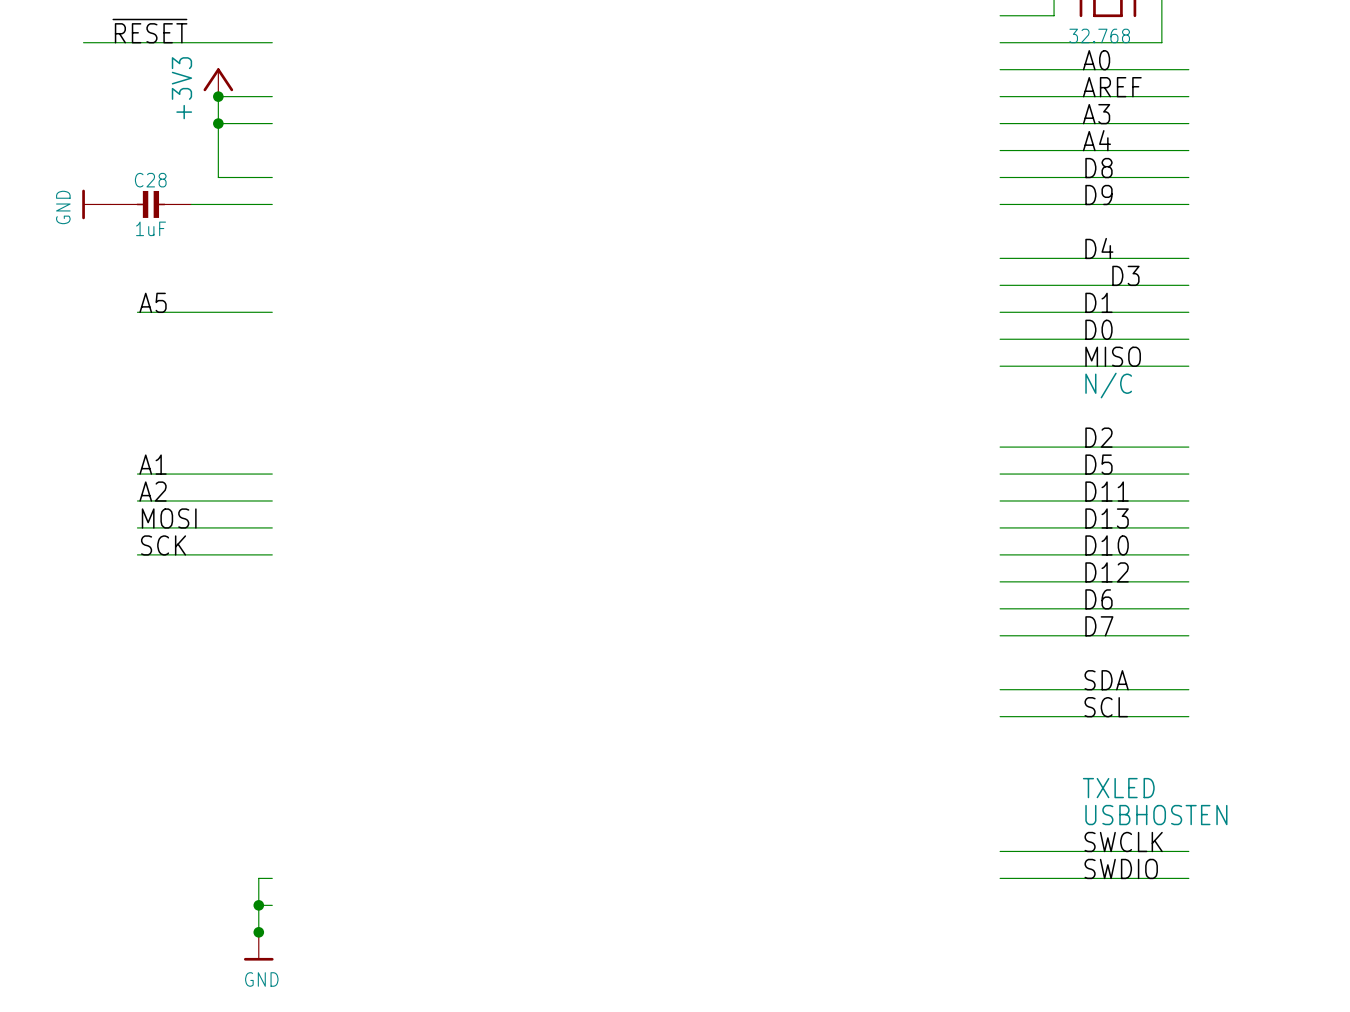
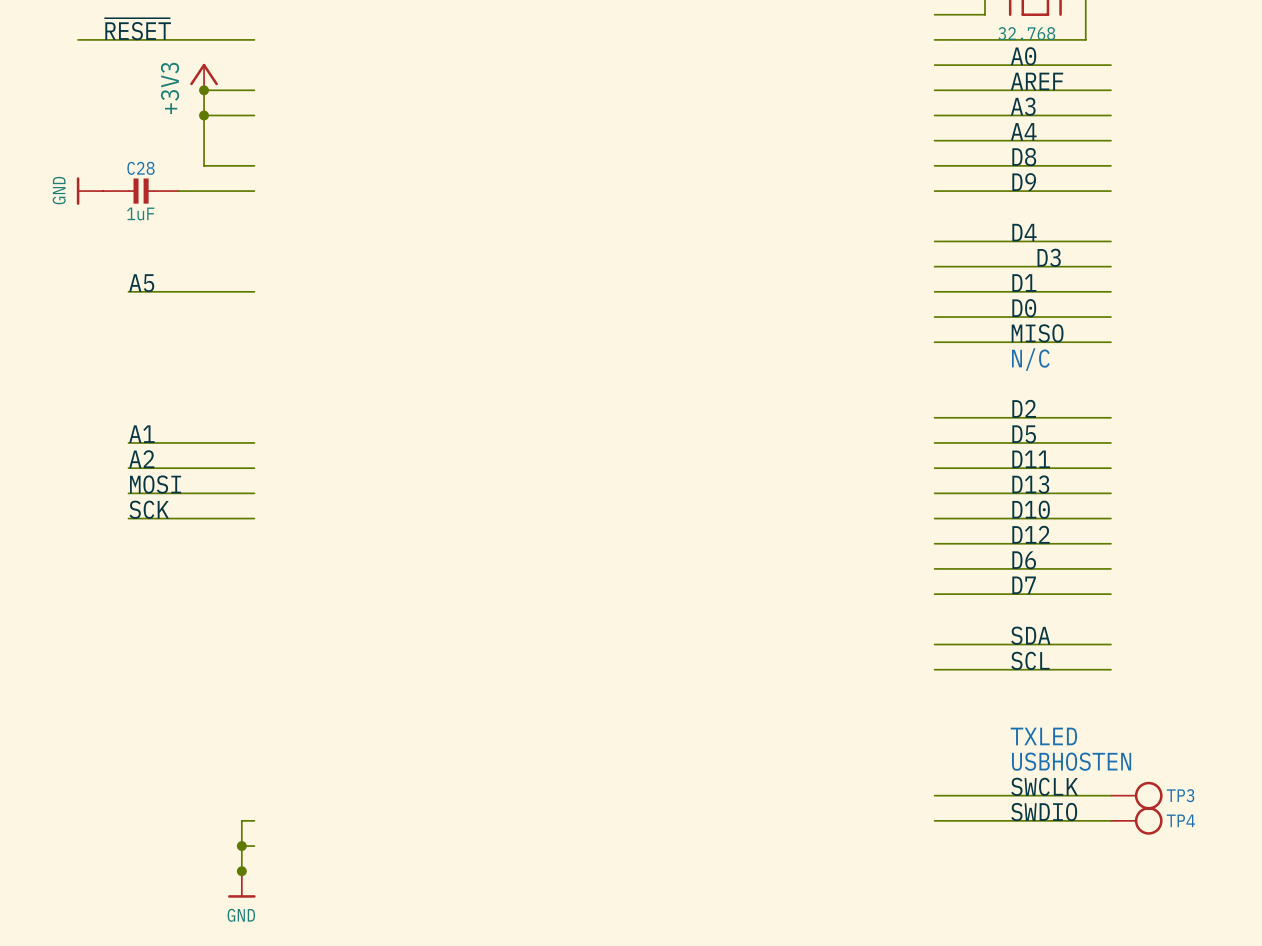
TP3: none -> (1136, 795)
TP4: none -> (1136, 820)

